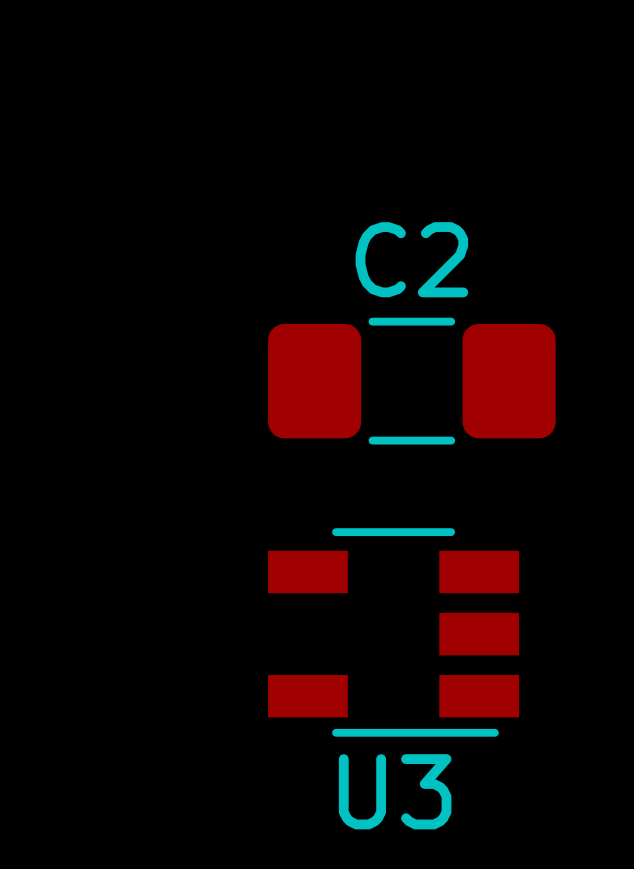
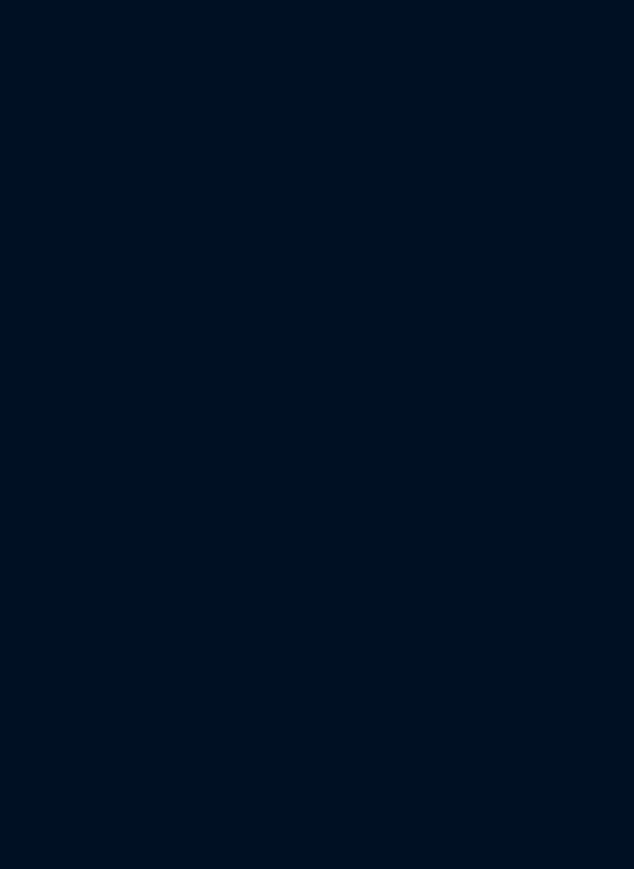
C2: (411, 381) -> none
U3: (393, 632) -> none

